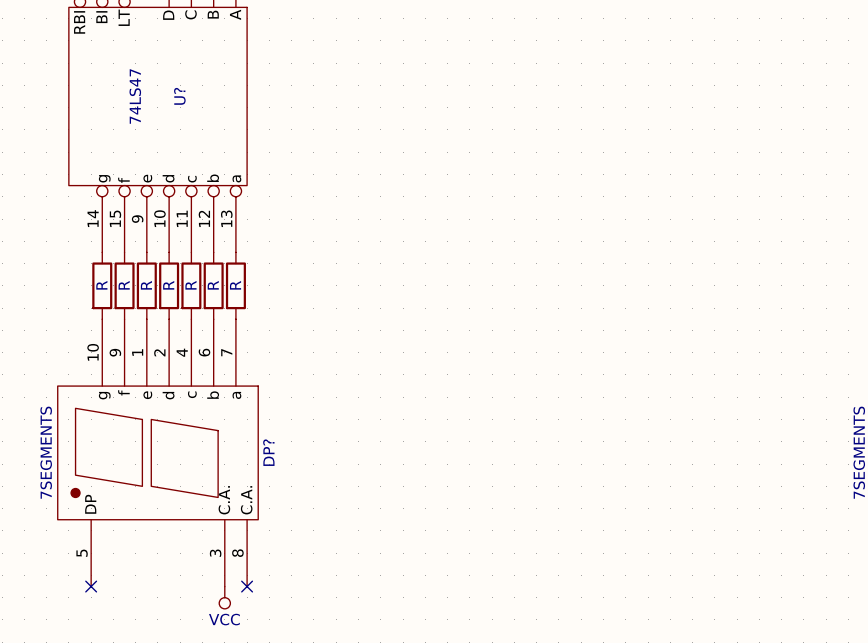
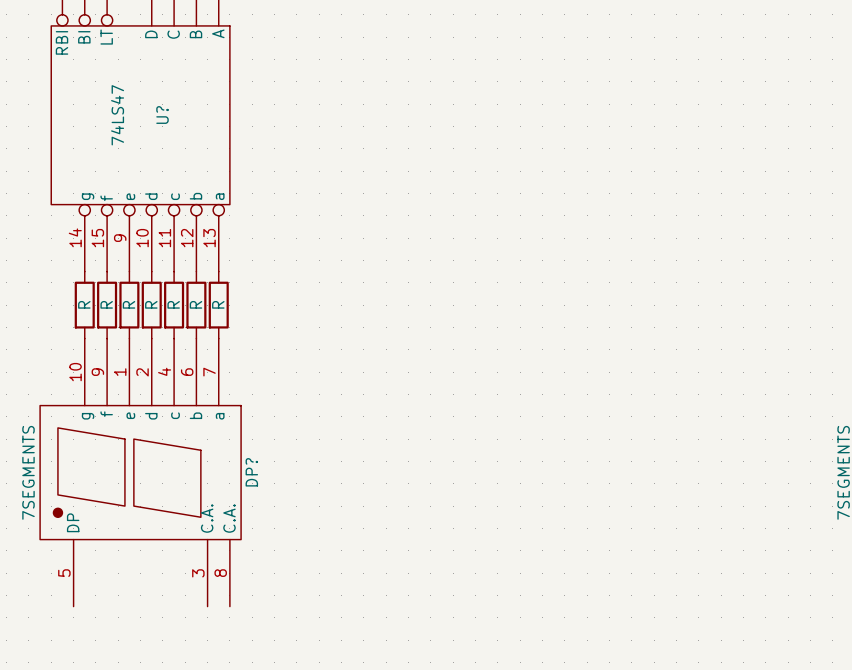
no-connect mark: (91, 586) -> none
no-connect mark: (247, 586) -> none
power symbol: VCC (224, 597) -> none

